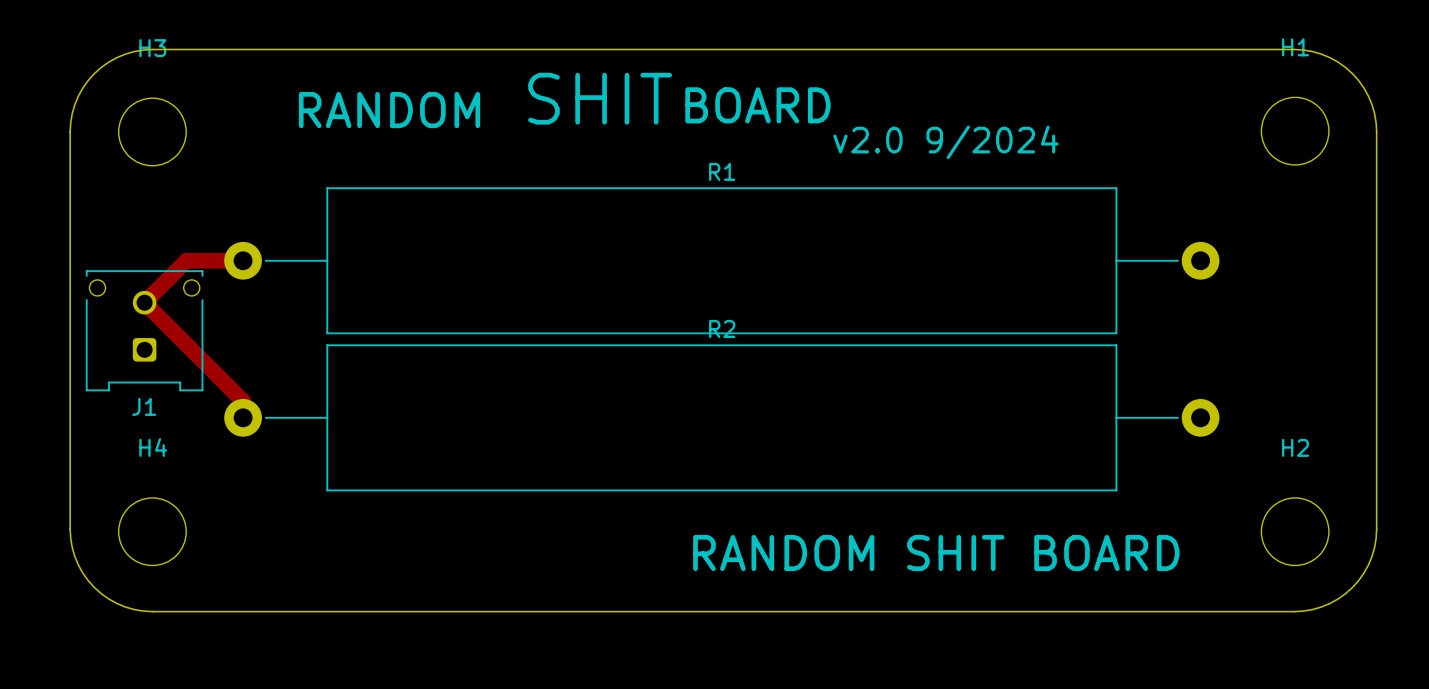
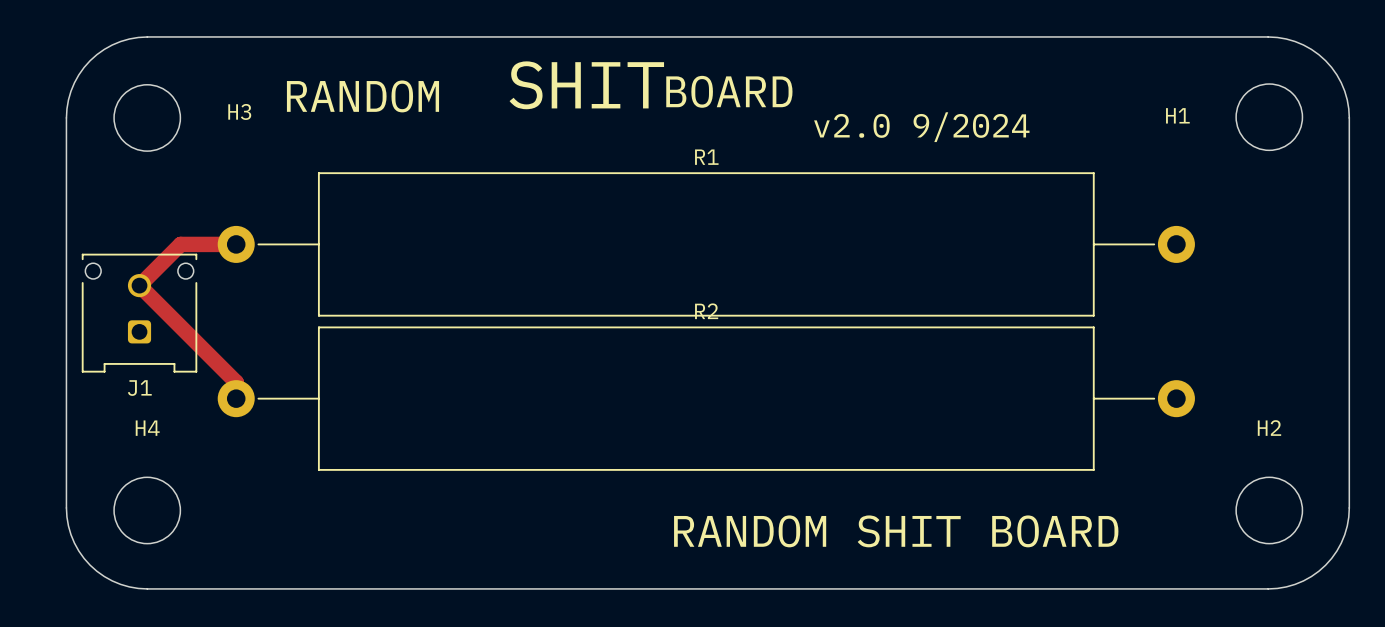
H1 name position: H1 (1295, 47) -> H1 (1177, 115)
H3 name position: H3 (152, 48) -> H3 (239, 111)

